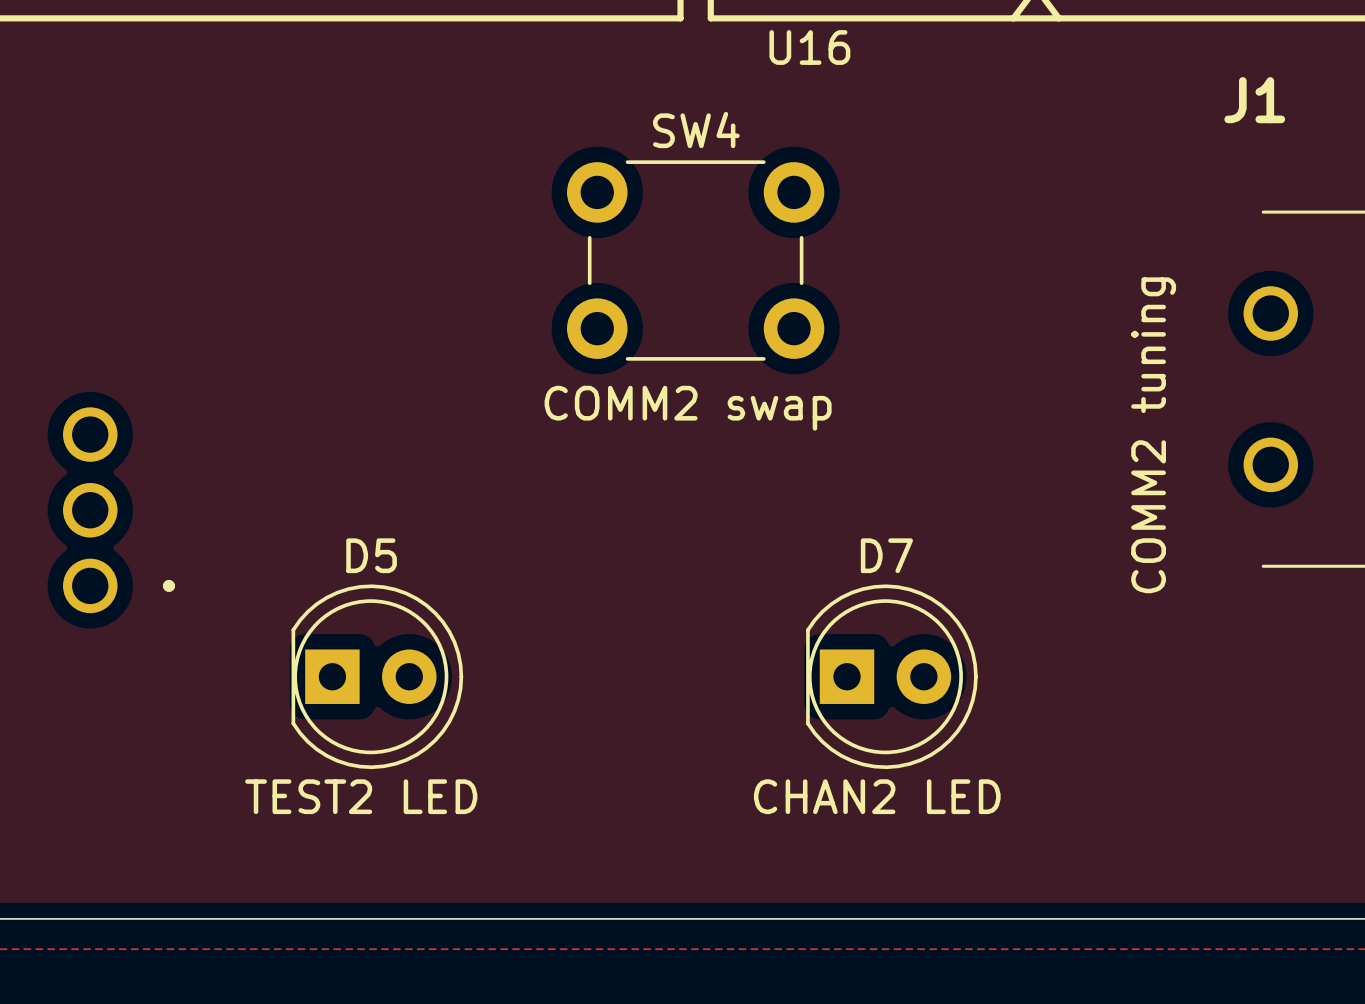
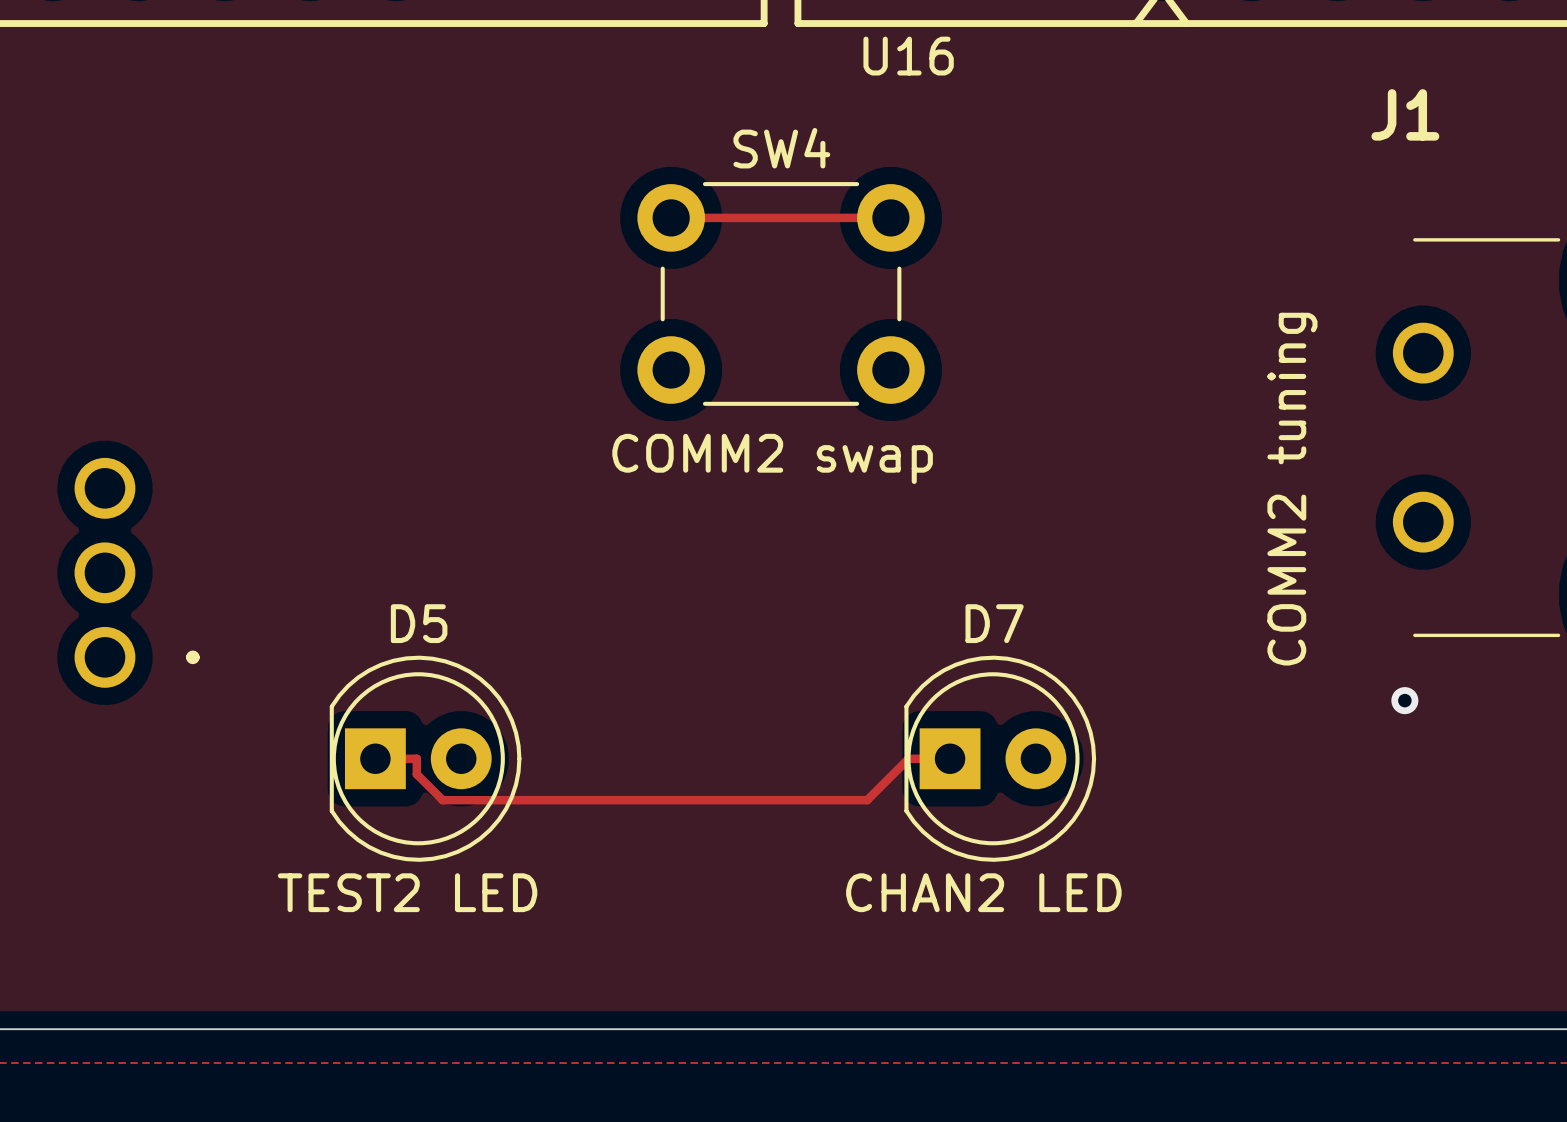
track: none -> (671, 217) (890, 217)
via: none -> (1404, 700)
track: none -> (375, 758) (416, 758) (416, 774) (442, 800) (867, 800) (908, 758) (950, 758)

